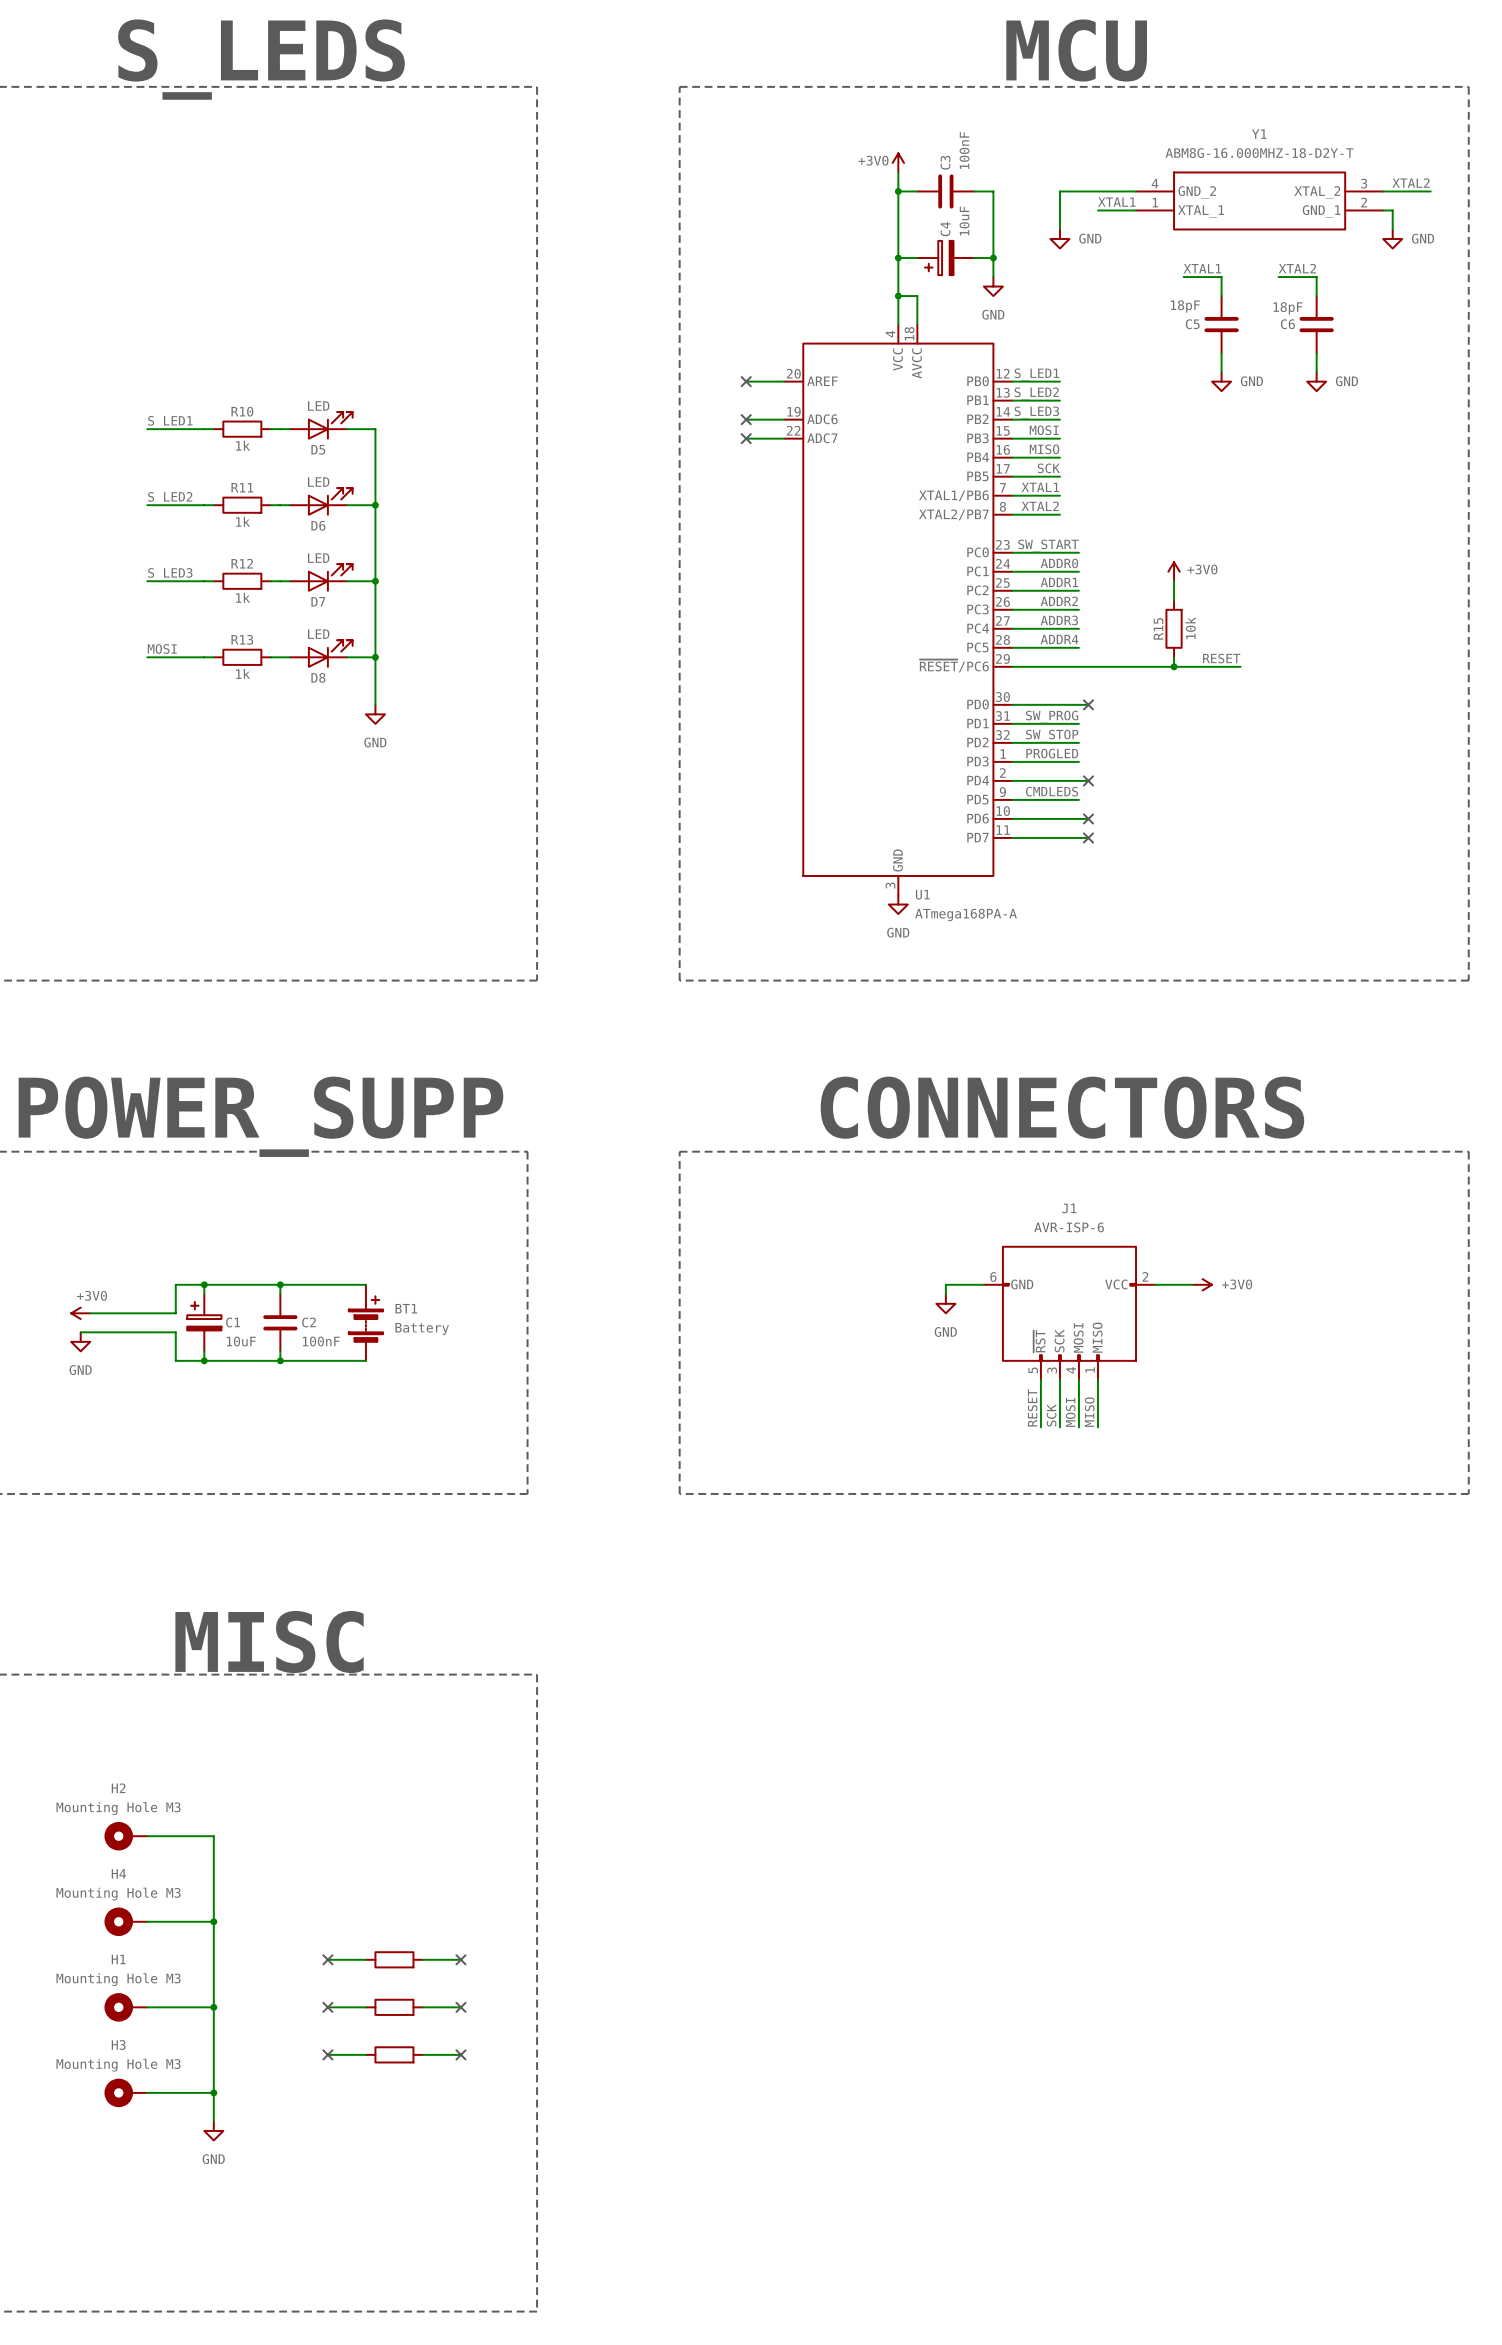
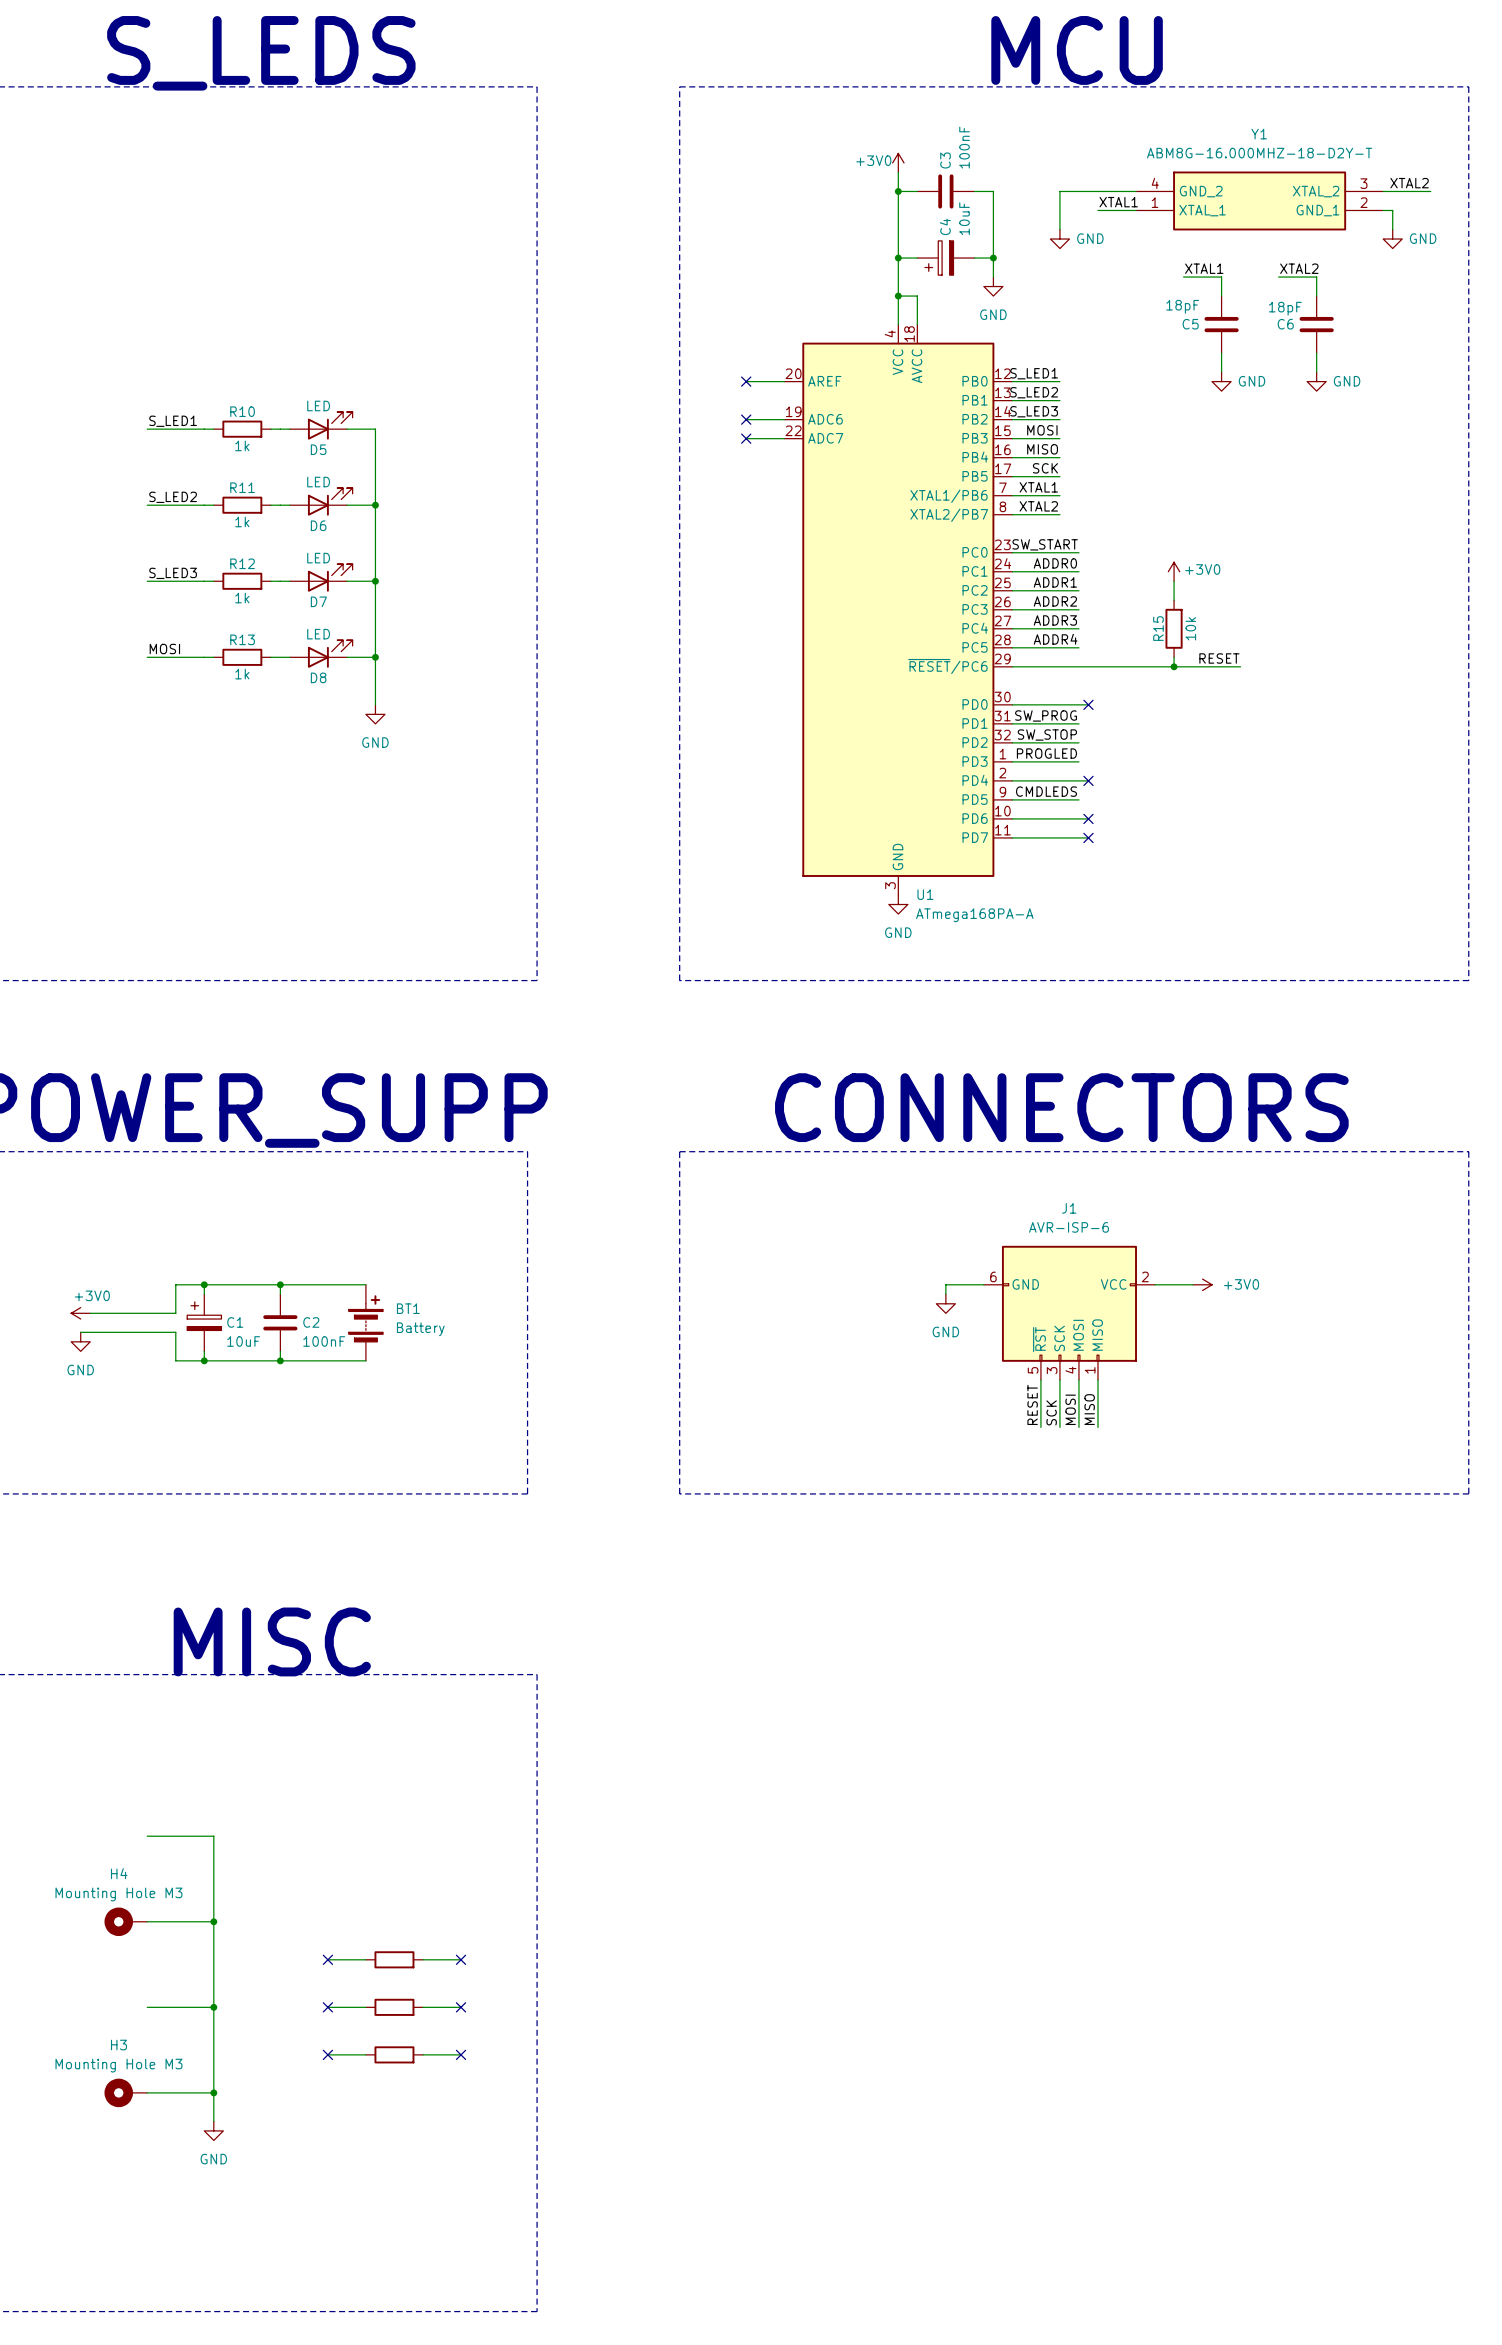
H2: Mounting Hole M3 (125, 1836) -> none
H1: Mounting Hole M3 (125, 2007) -> none

